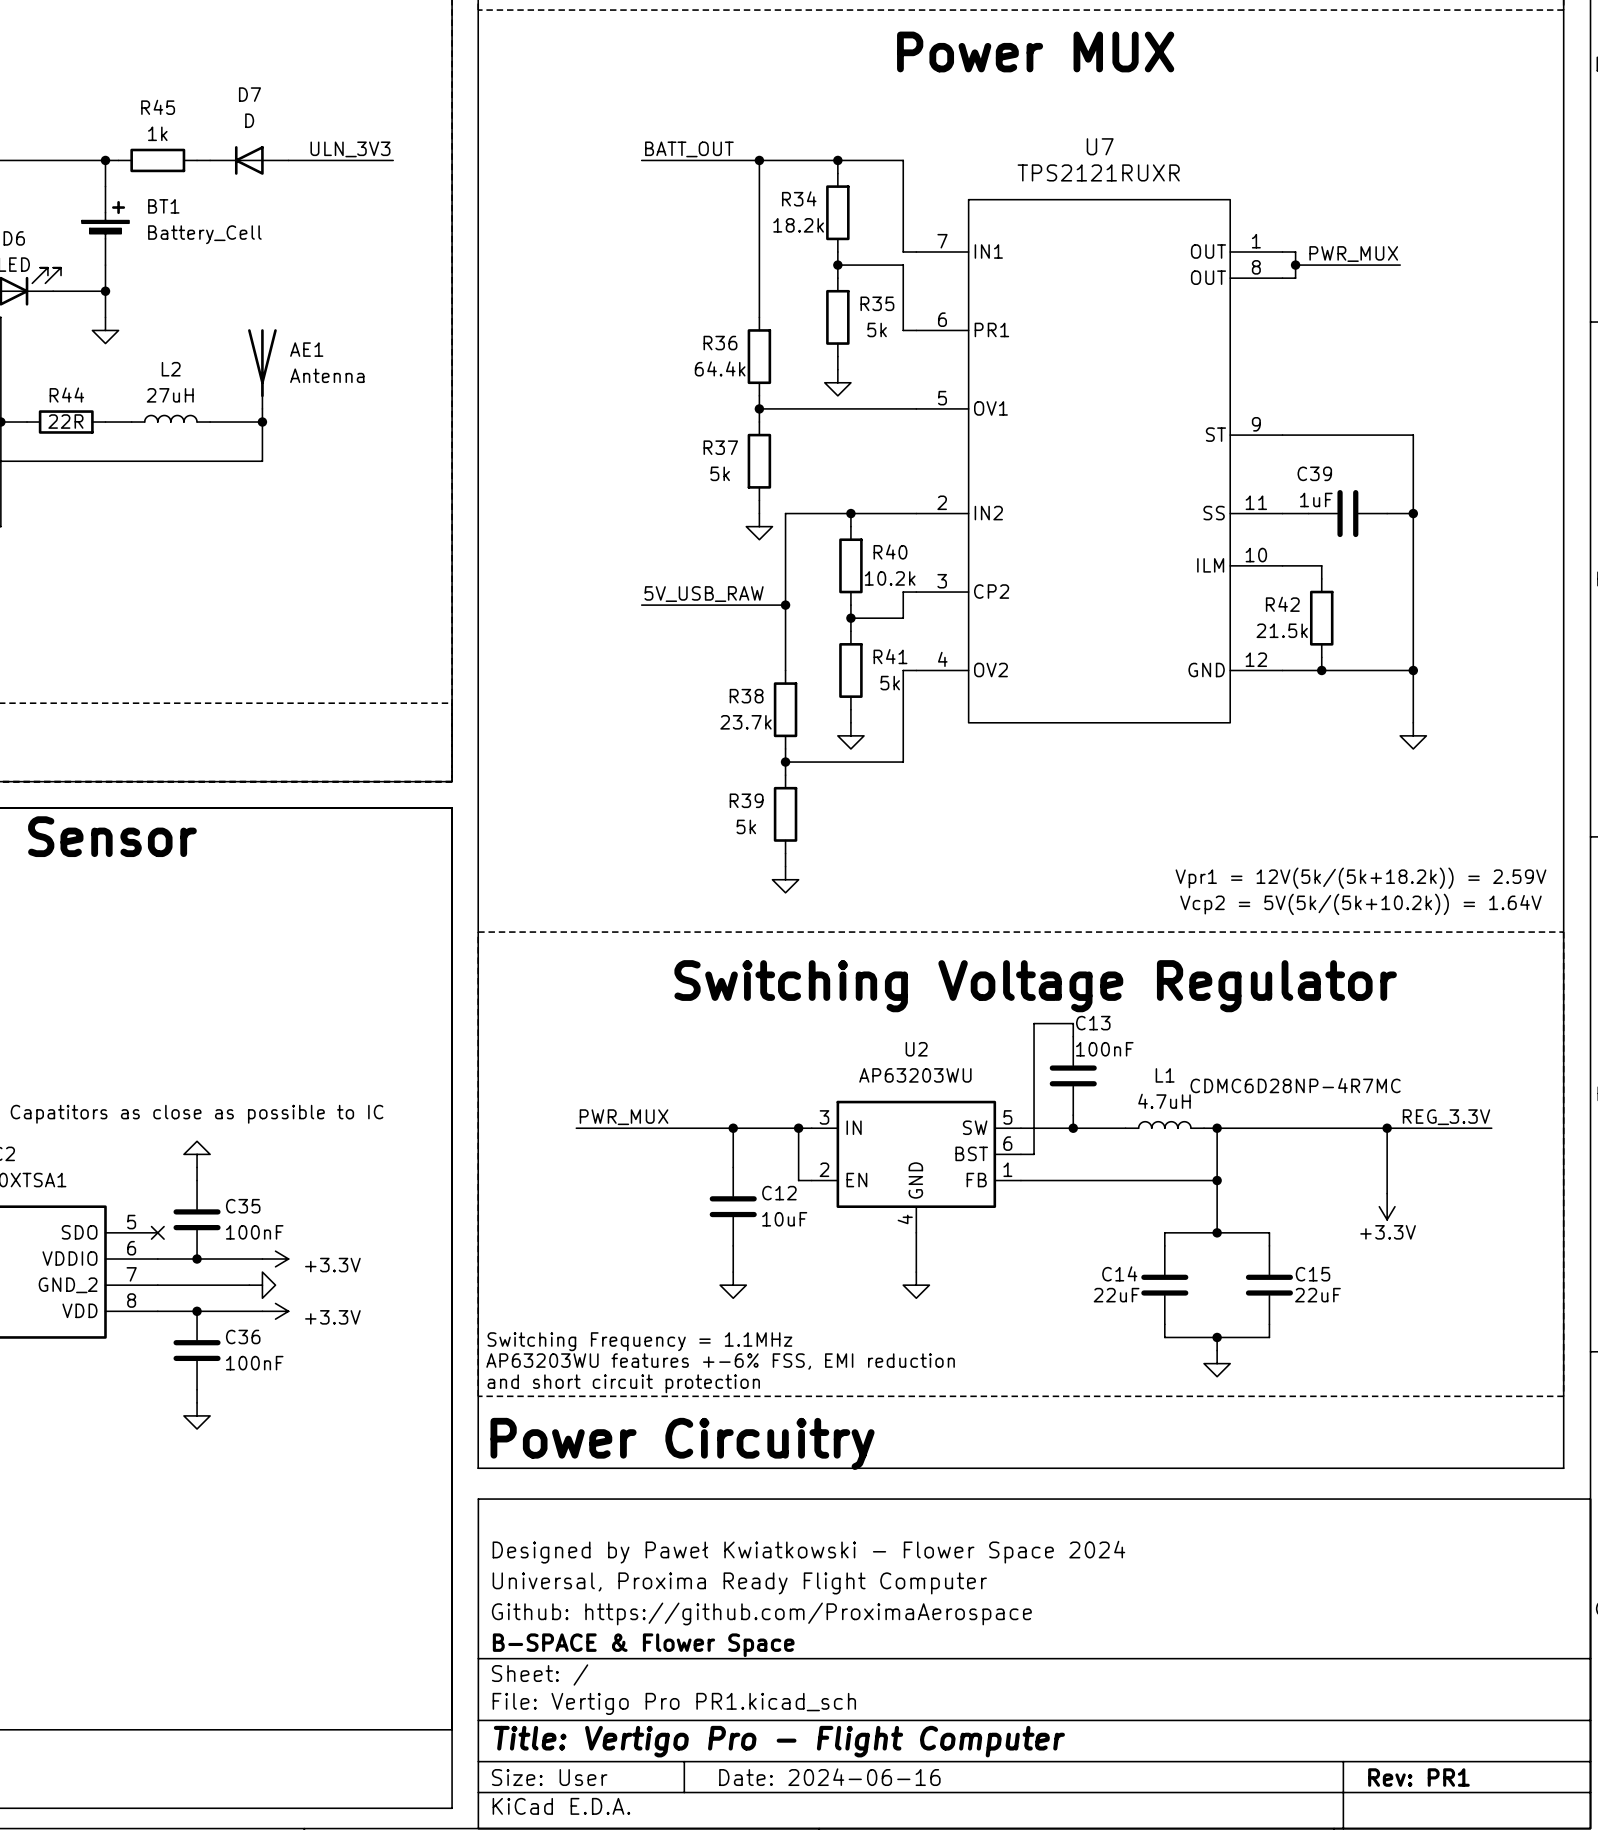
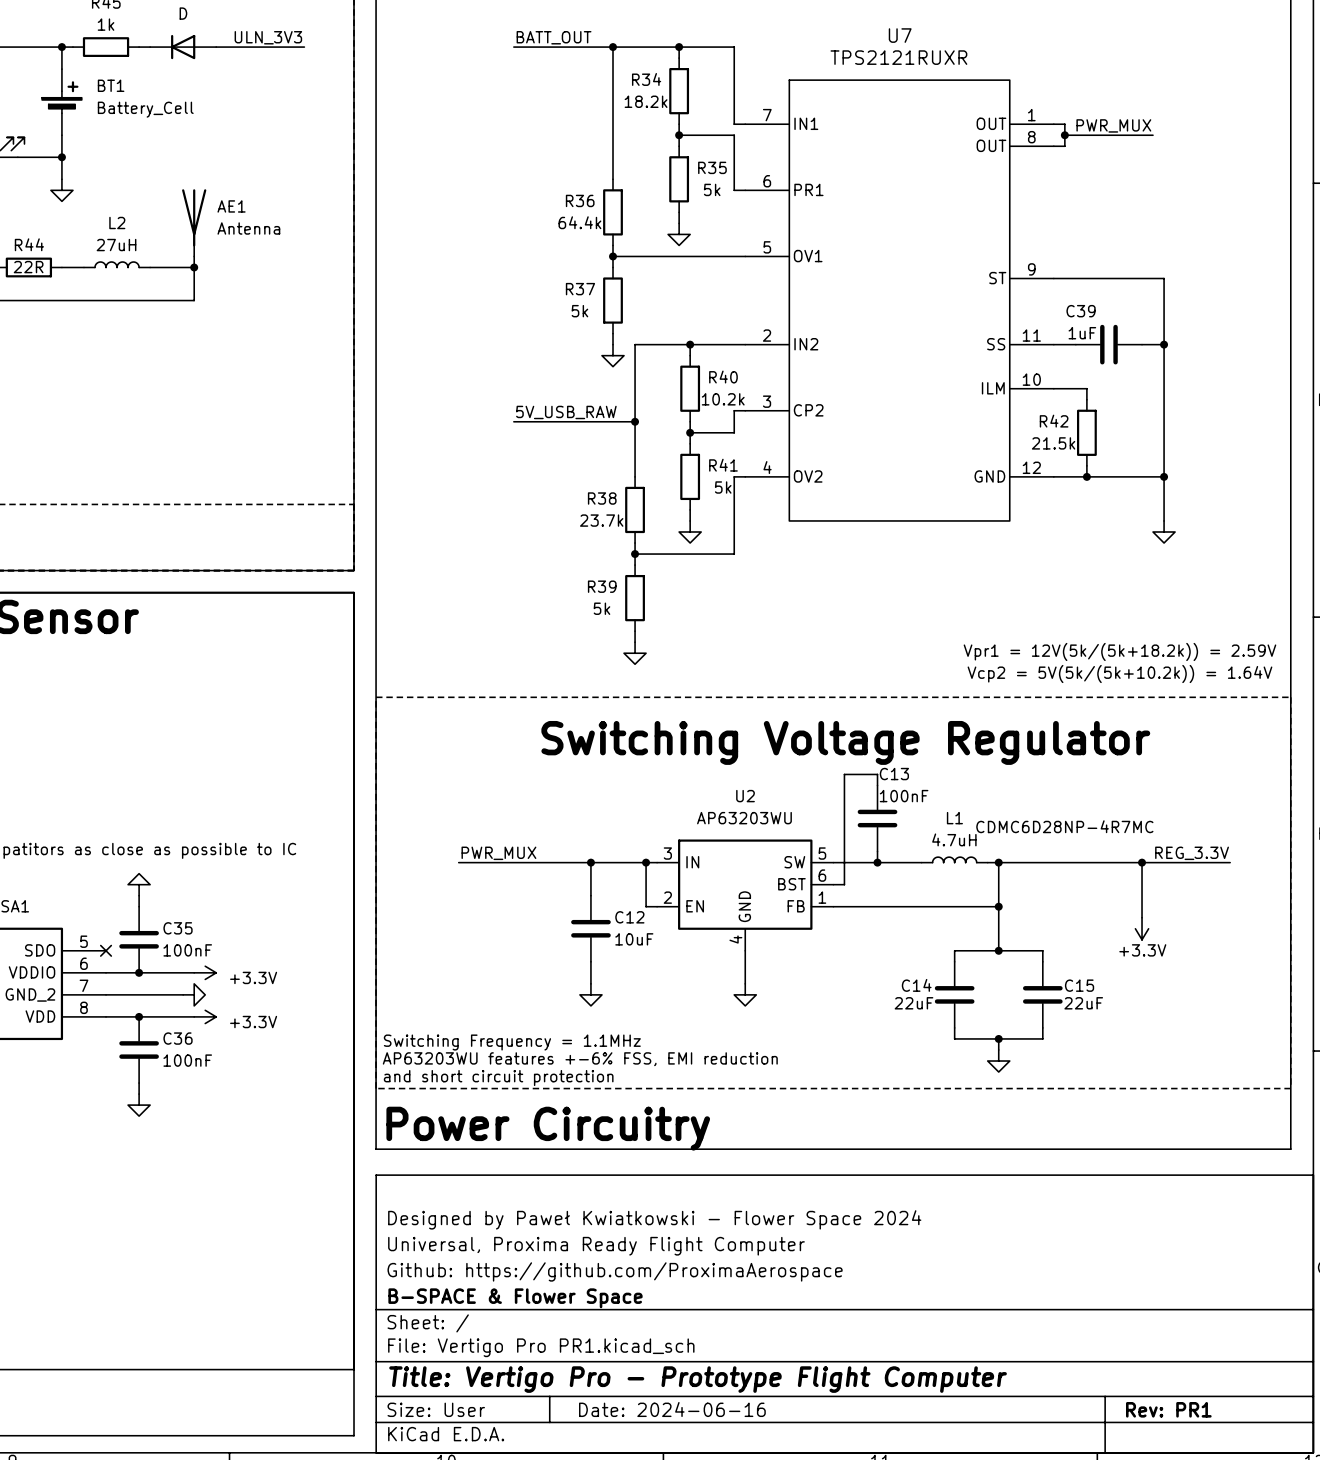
title block: Title: Vertigo Pro - Flight Computer (779, 1741) -> Title: Vertigo Pro - Prototype Flight Computer (698, 1379)

